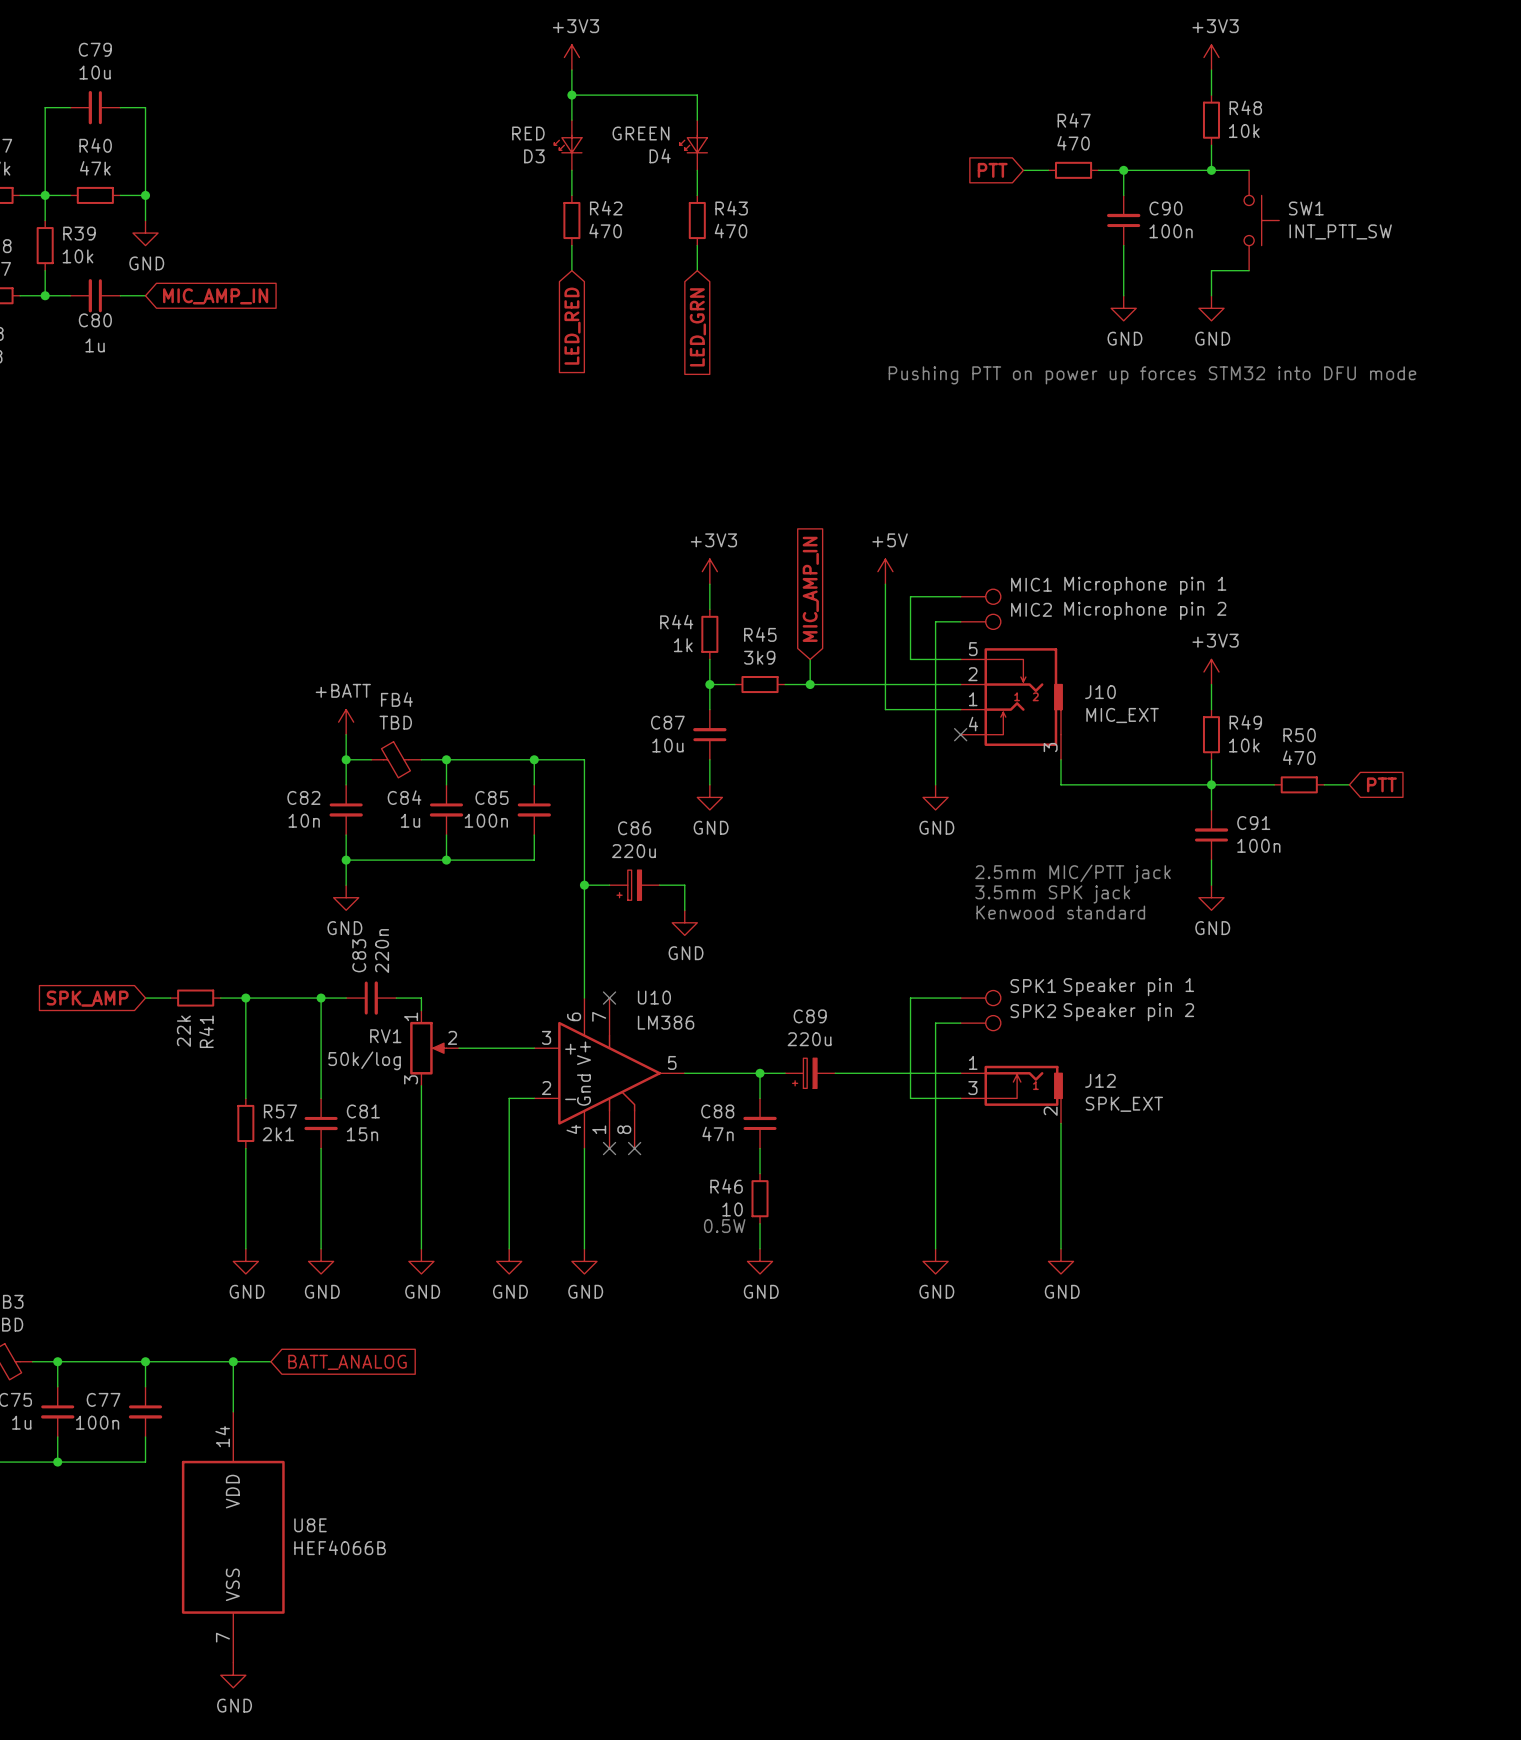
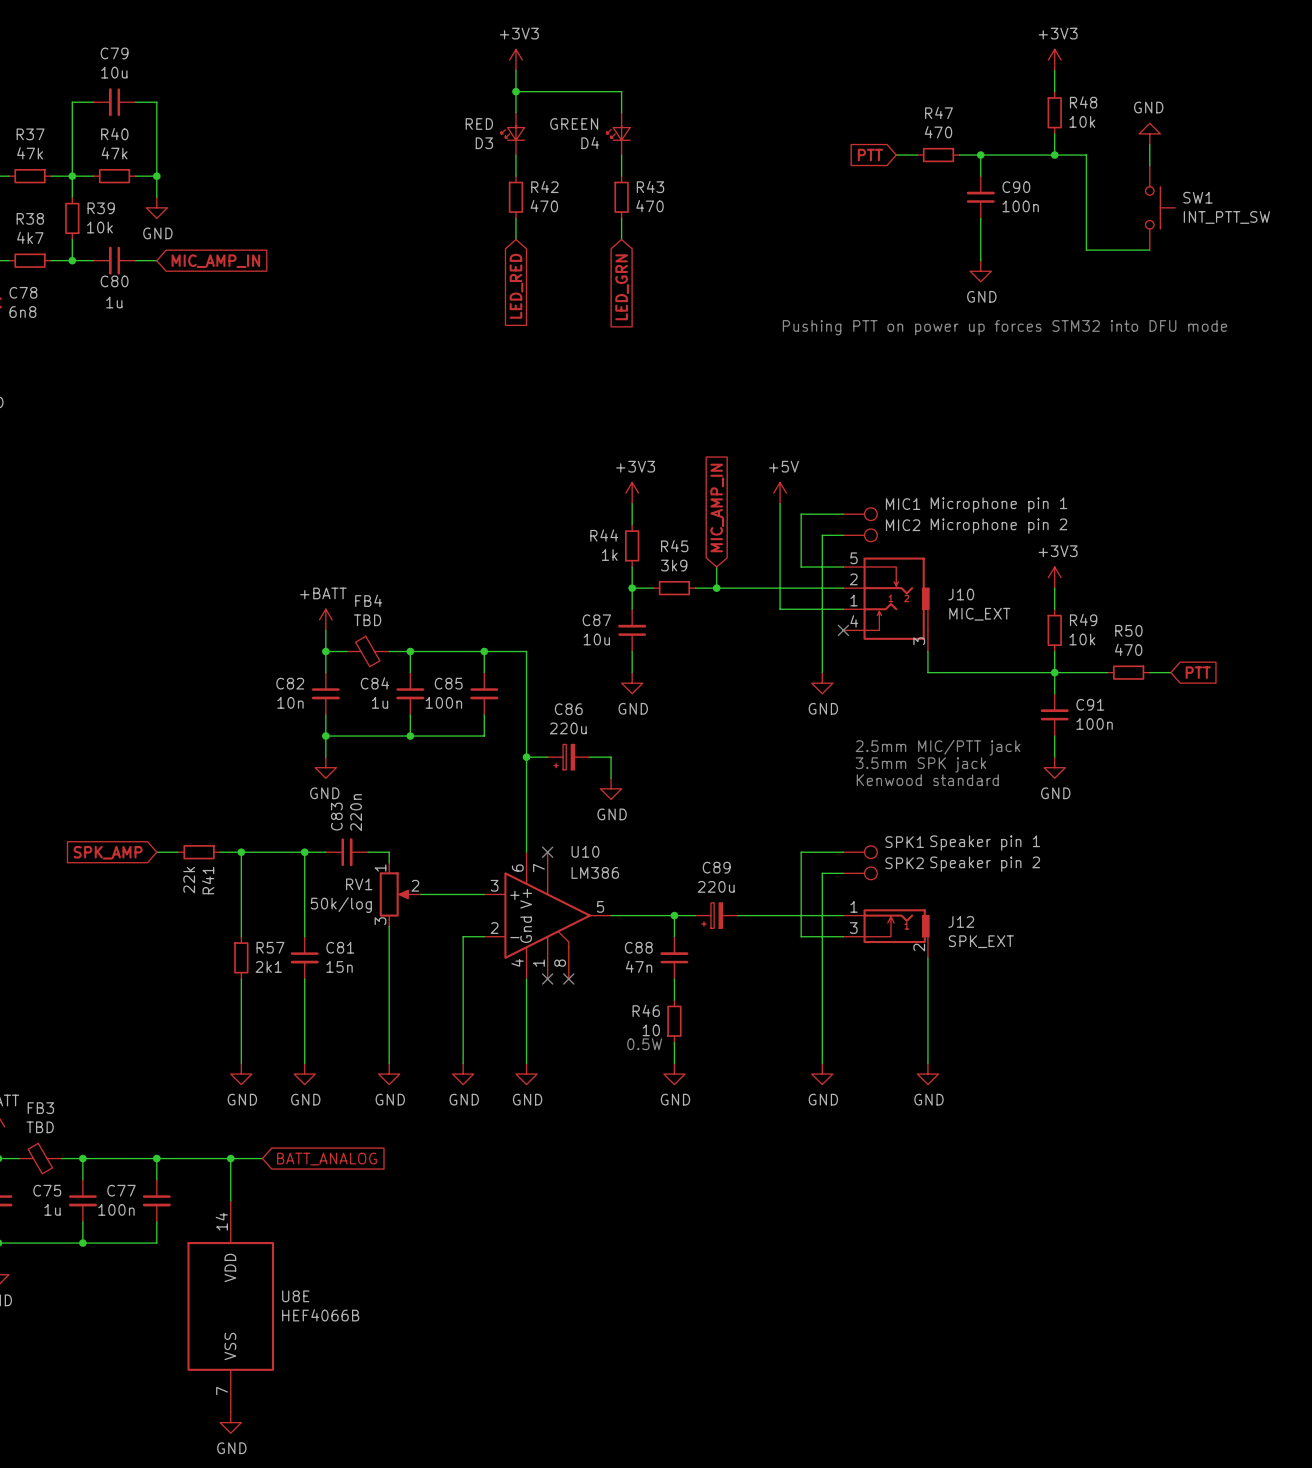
wire: none -> (1149, 144) (1149, 165)
wire: none -> (1086, 155) (1086, 250) (1149, 250)
SW1 position: (1261, 220) -> (1160, 207)
wire: (1249, 270) (1211, 270) (1211, 295) -> none
power symbol rotation: 0° (1211, 308) -> 180° (1149, 133)
power symbol position: GND (1211, 308) -> GND (1149, 133)

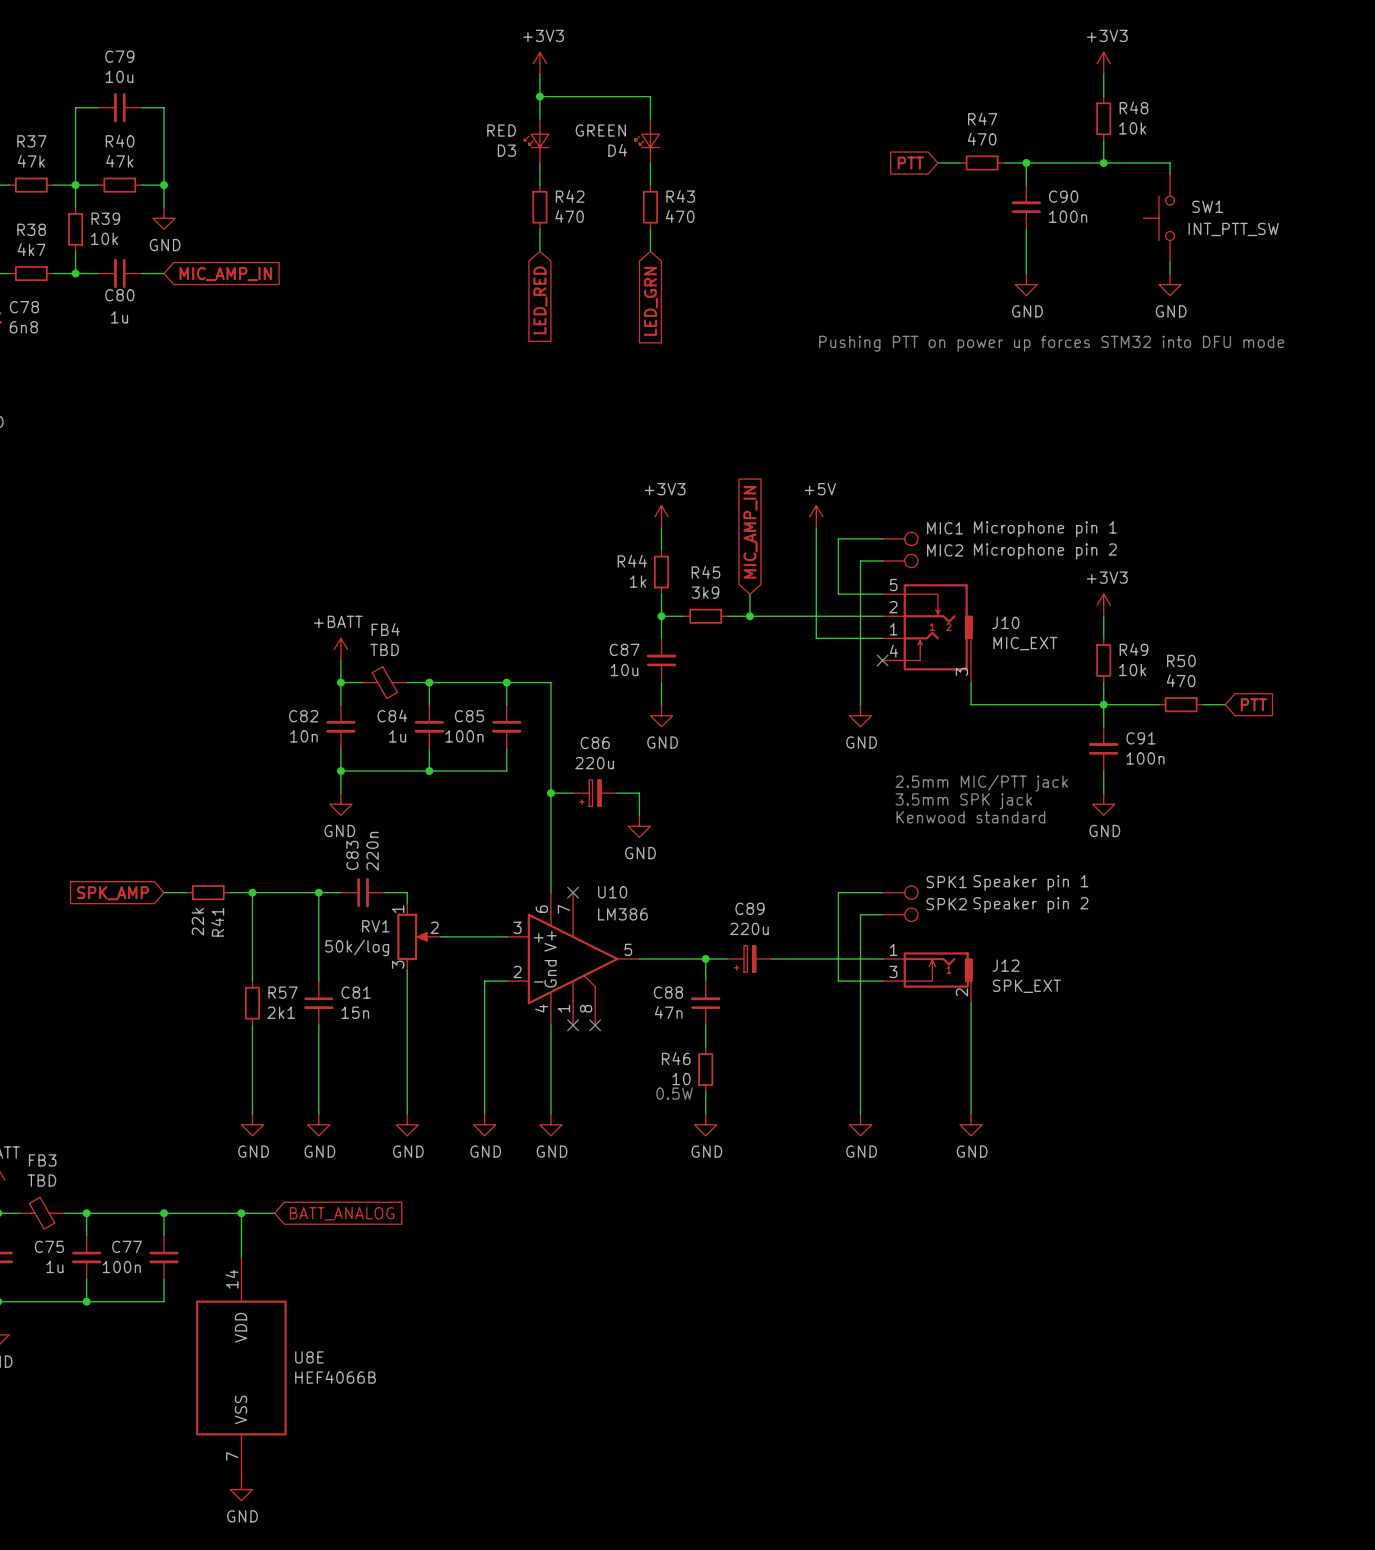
power symbol rotation: 0° (1149, 133) -> 180° (1170, 284)
power symbol position: GND (1149, 133) -> GND (1170, 284)
wire: (1149, 144) (1149, 165) -> none
wire: (1086, 155) (1086, 250) (1149, 250) -> (1136, 163) (1170, 163) (1170, 174)
SW1 rotation: 0° (1160, 207) -> 180° (1159, 218)
SW1 position: (1160, 207) -> (1159, 218)
wire: none -> (1170, 262) (1170, 273)

